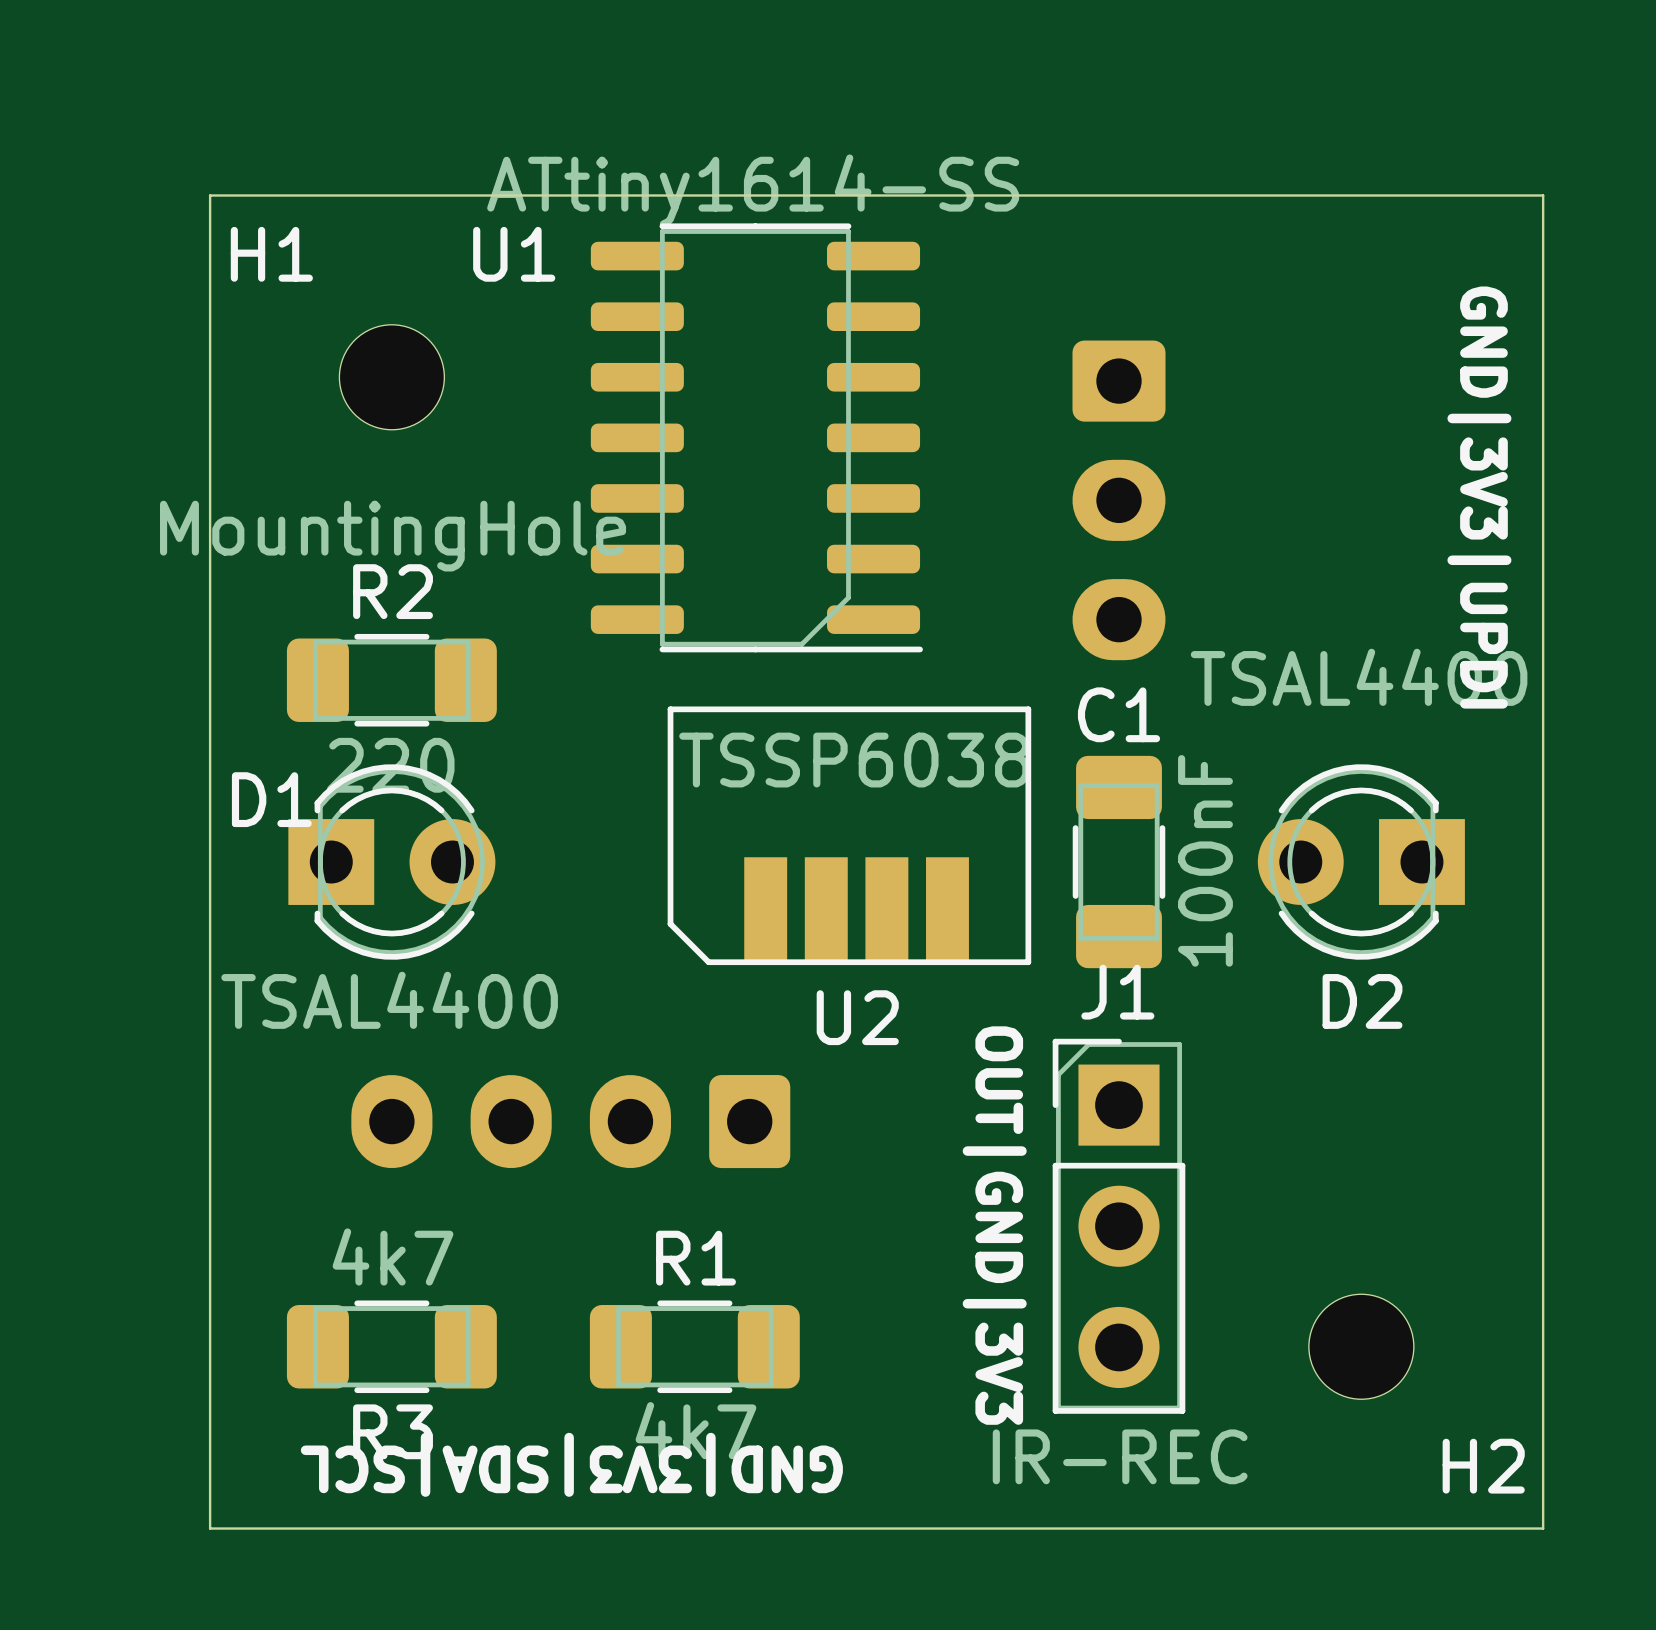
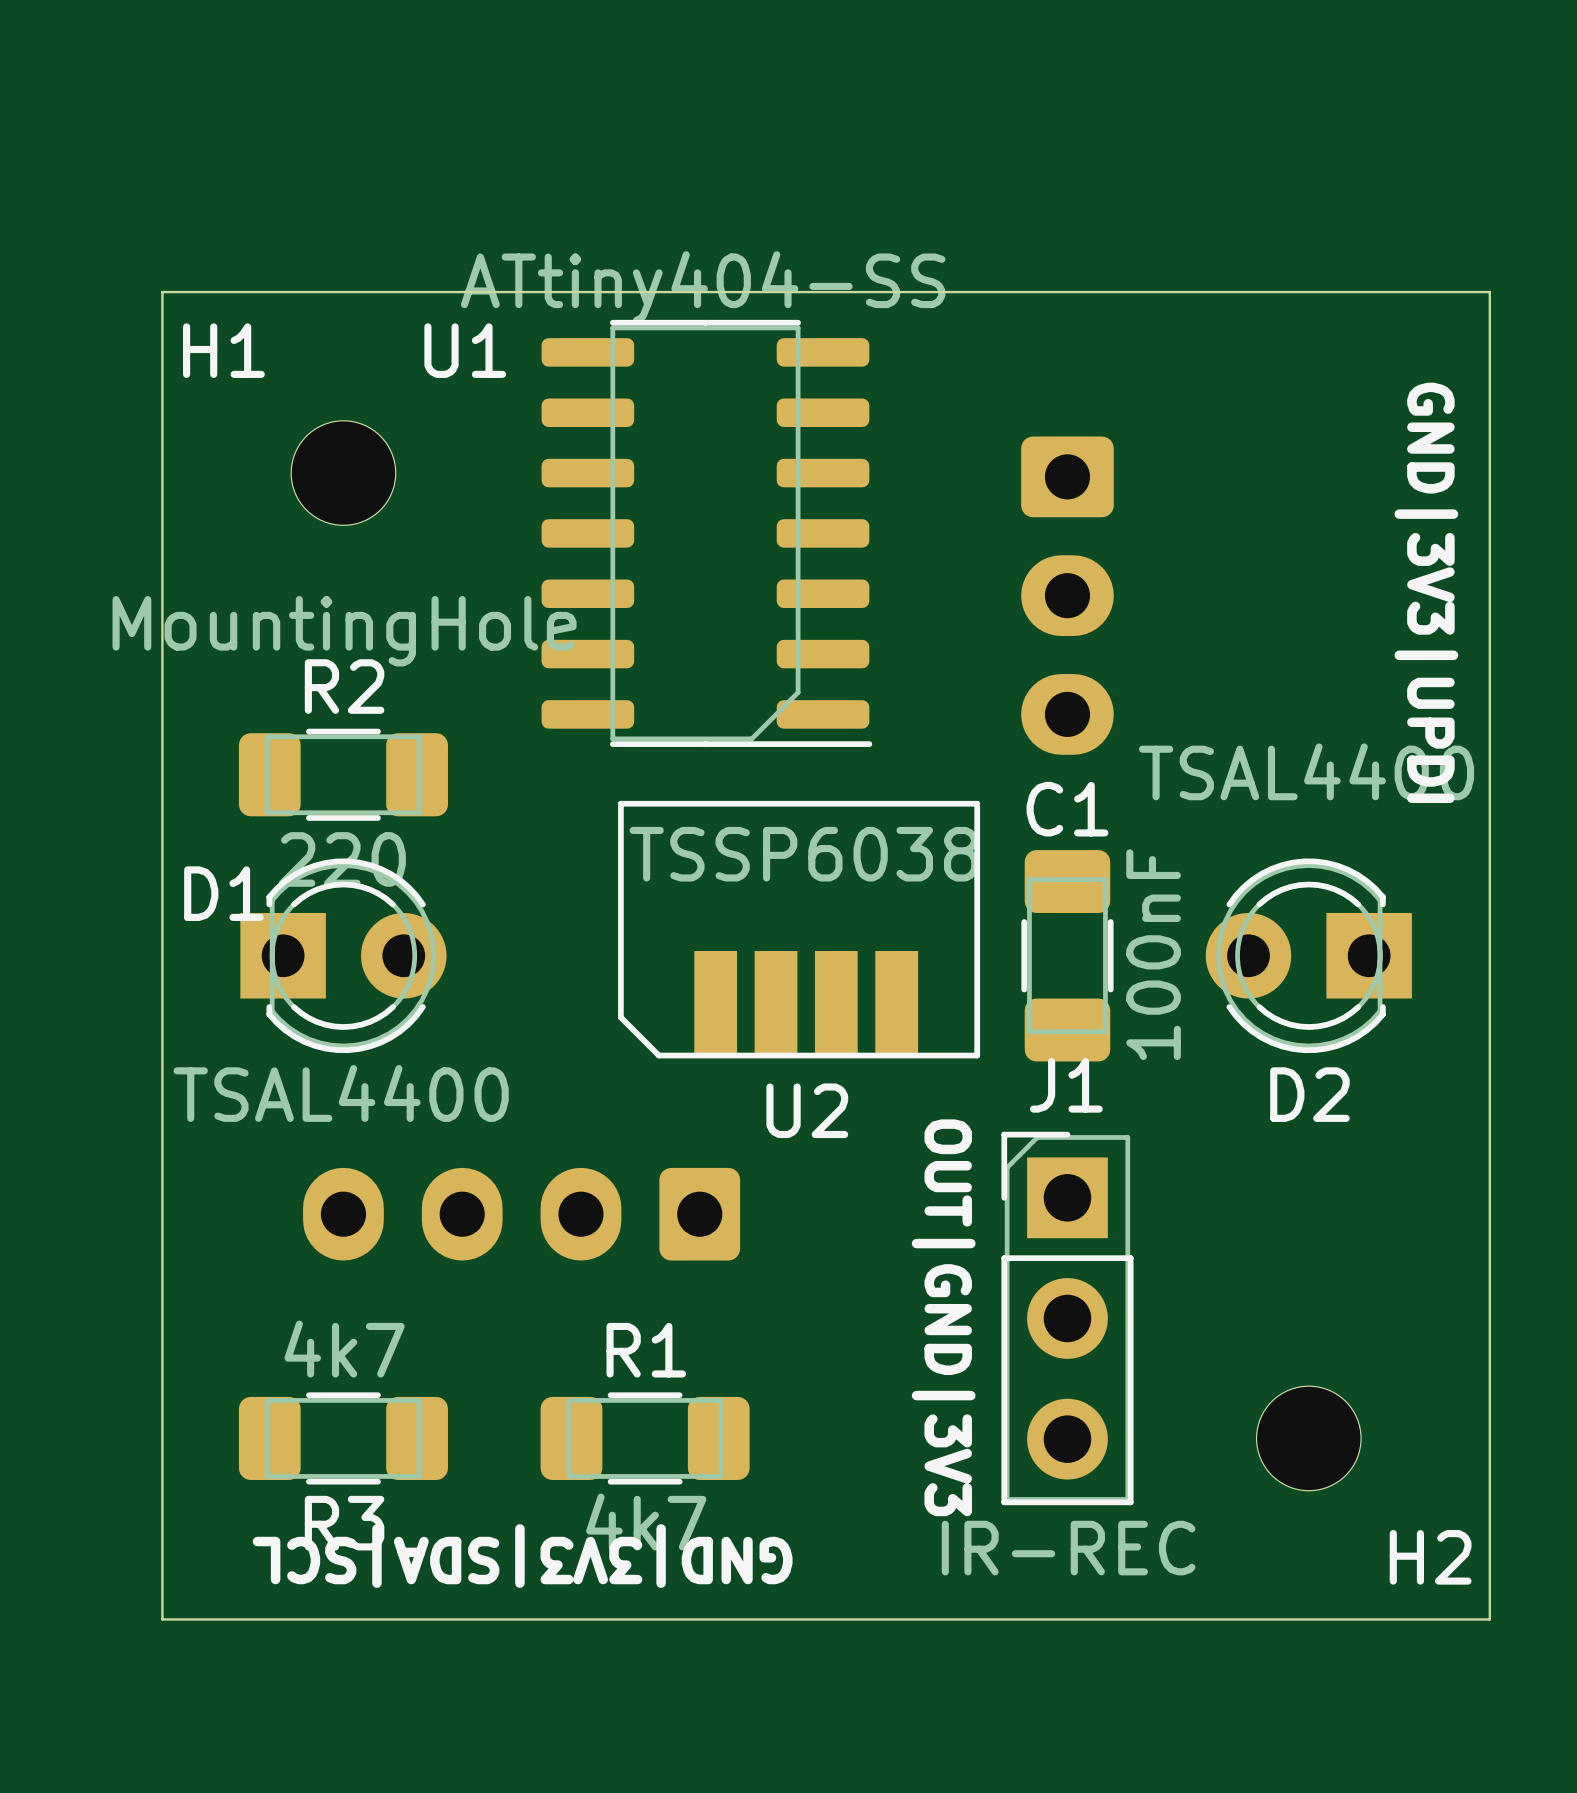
U1 value: ATtiny1614-SS (753, 190) -> ATtiny404-SS (703, 287)

